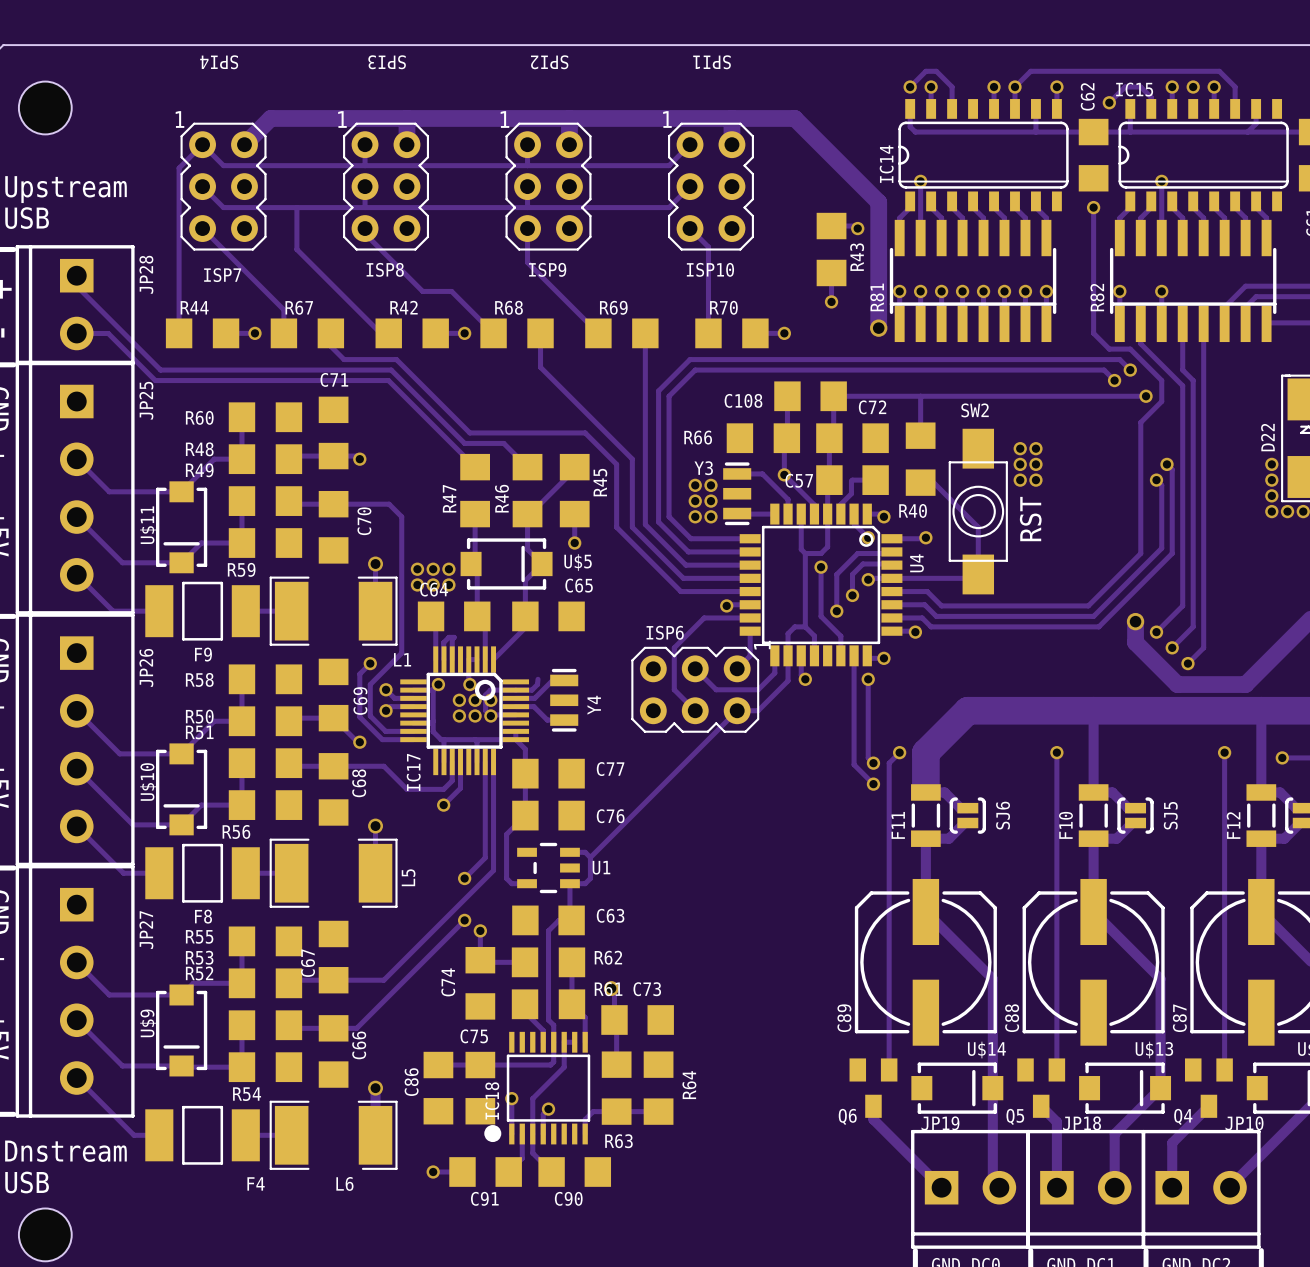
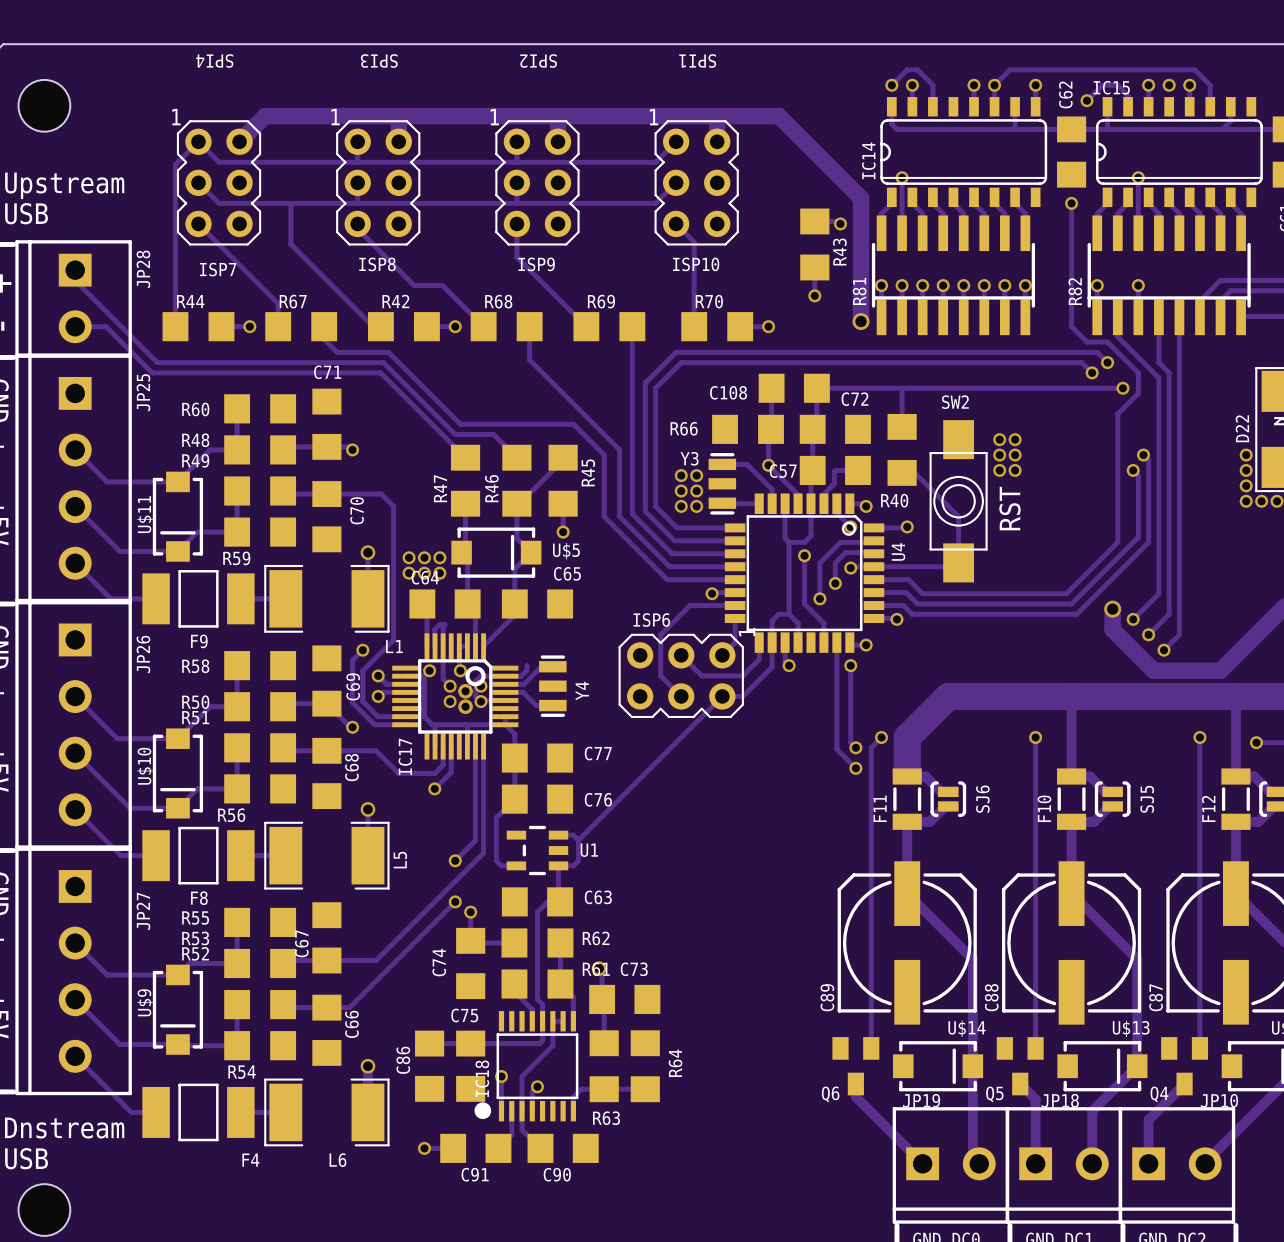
track: none -> (443, 646) (443, 679) (450, 686)
via: (475, 700) -> none
via: none -> (465, 691)
via: (475, 715) -> none
via: none -> (465, 706)

